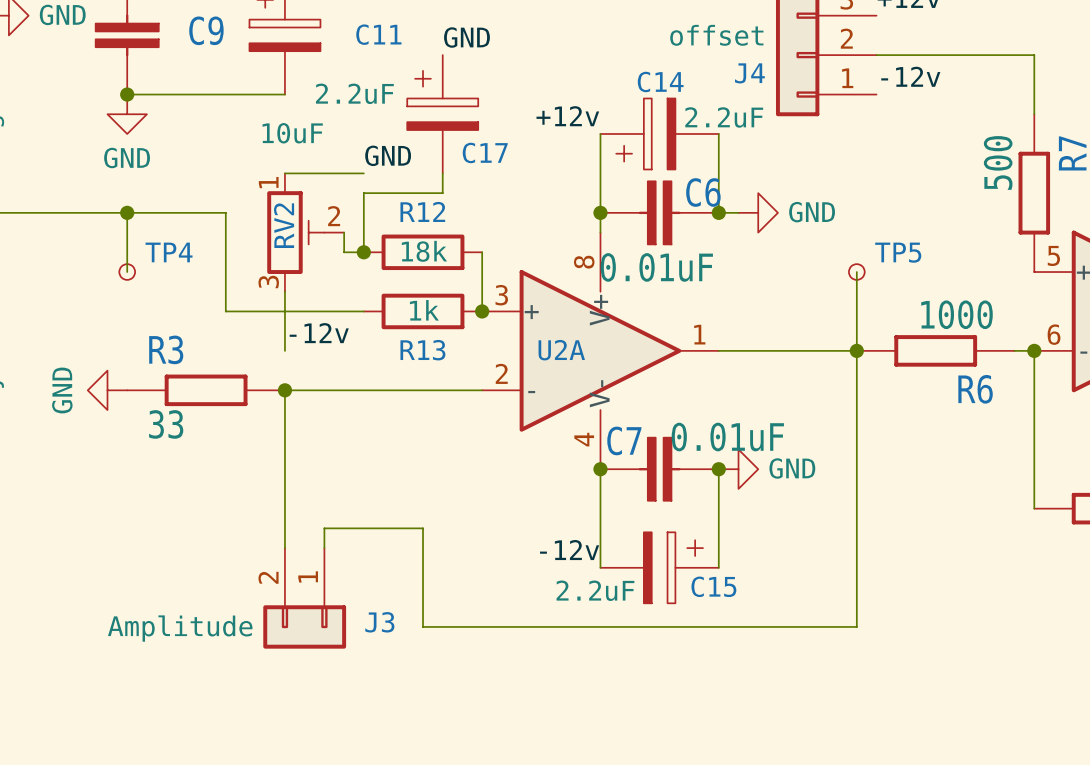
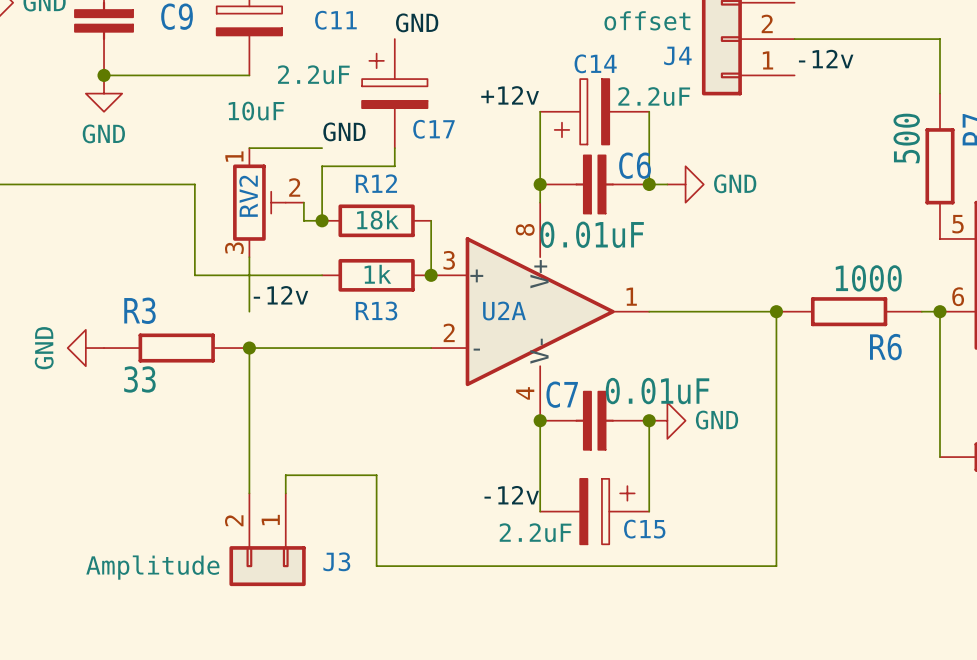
wire: (127, 212) (127, 272) -> none
junction: (127, 212) -> none
TP4: (127, 272) -> none
wire: (856, 272) (856, 350) -> none
TP5: (856, 272) -> none

